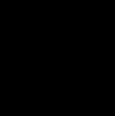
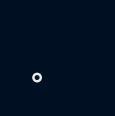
via: none -> (37, 77)

